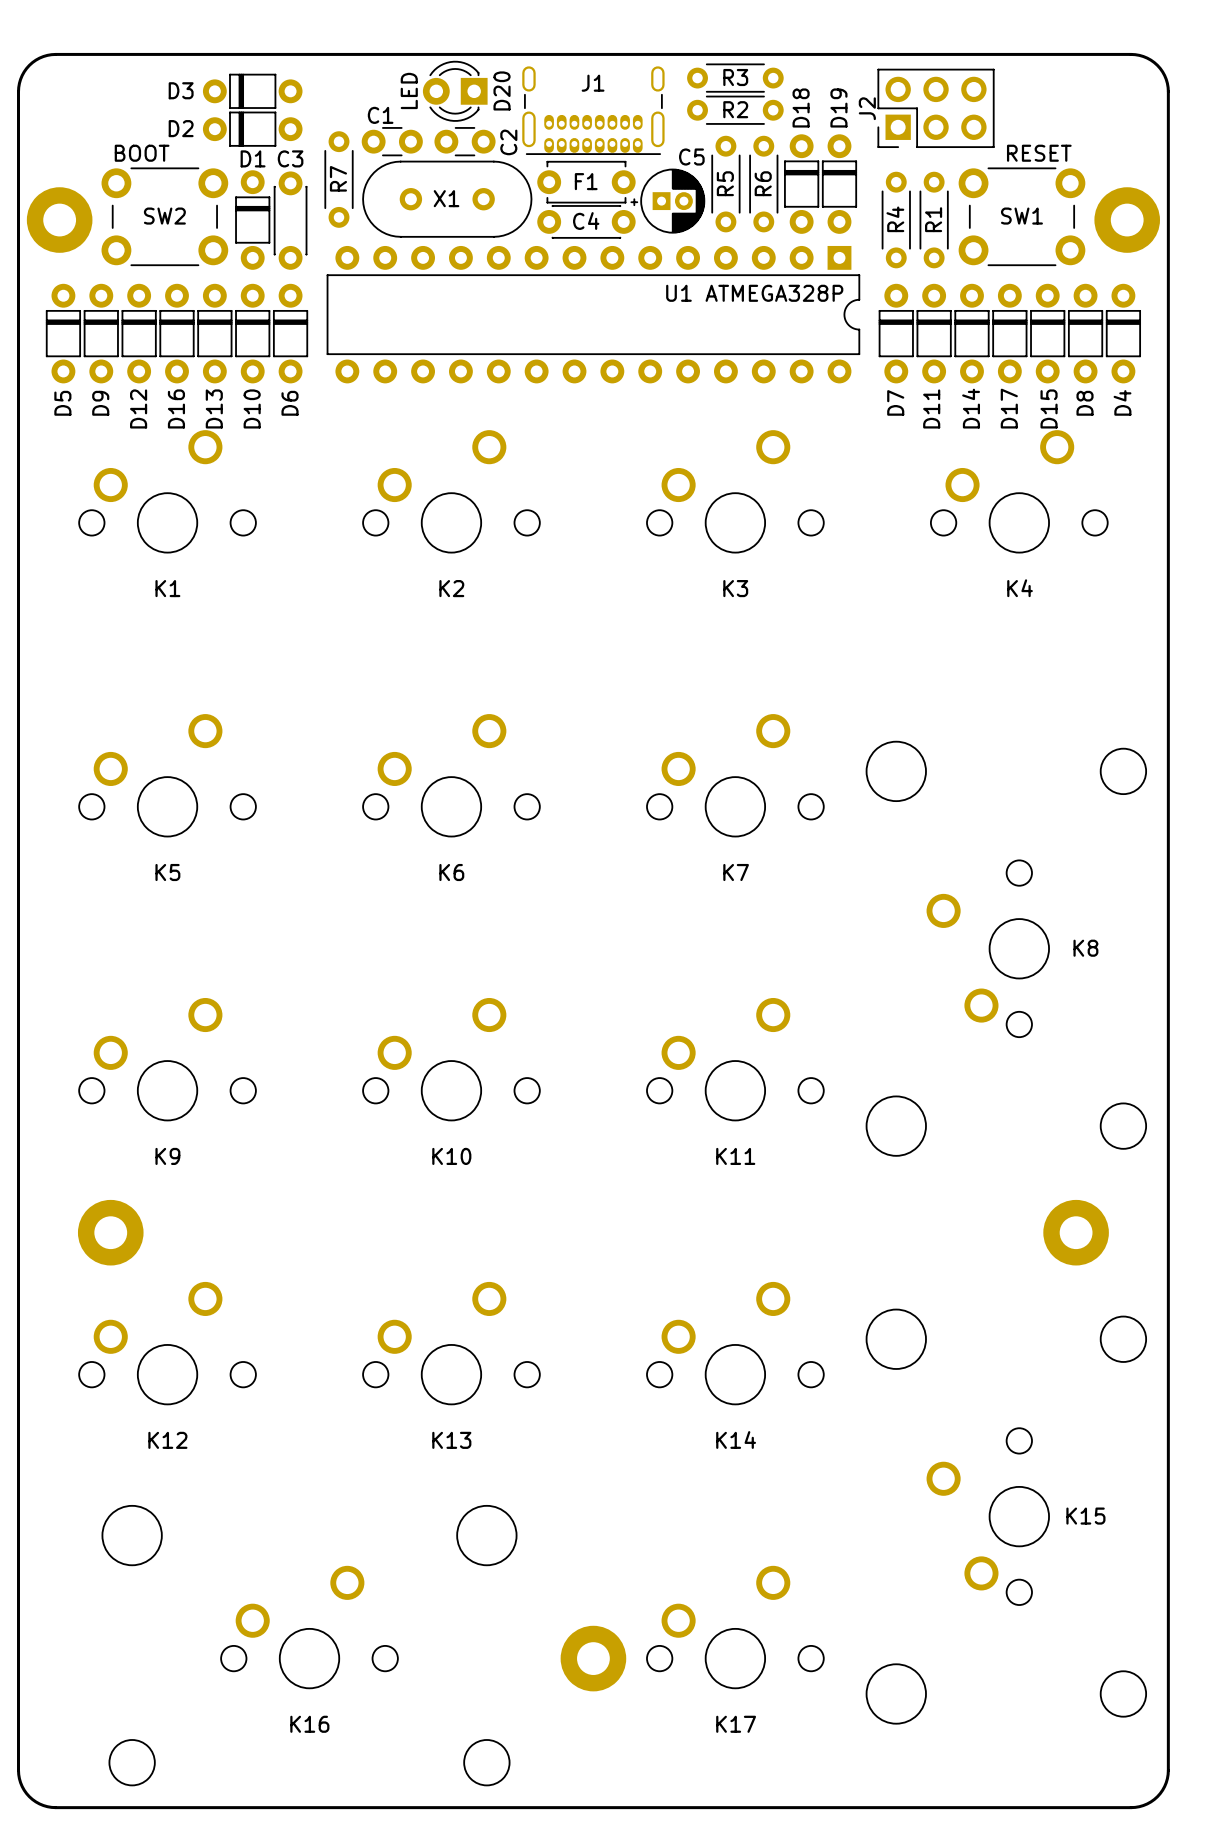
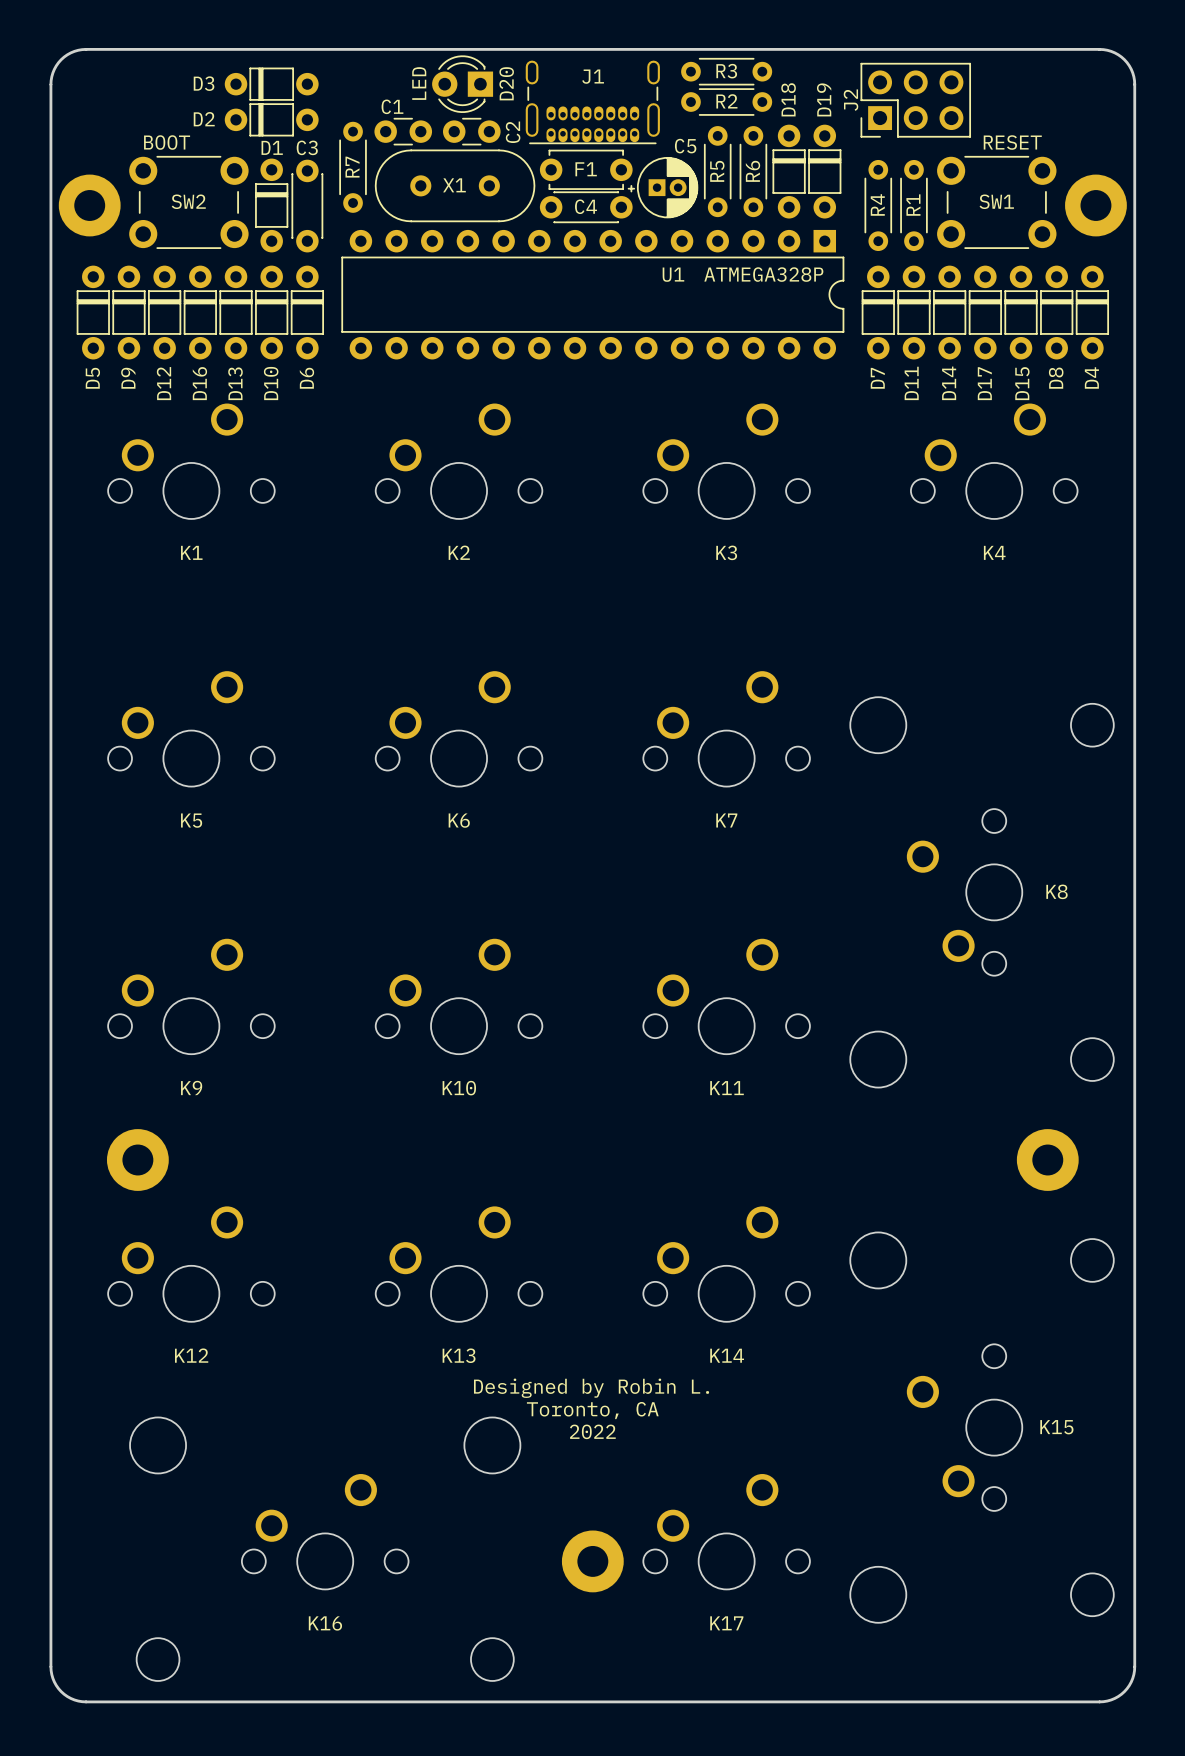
text: none -> Designed by Robin L. (591, 1388)
text: none -> Toronto, CA (592, 1410)
text: none -> 2022 (592, 1431)

